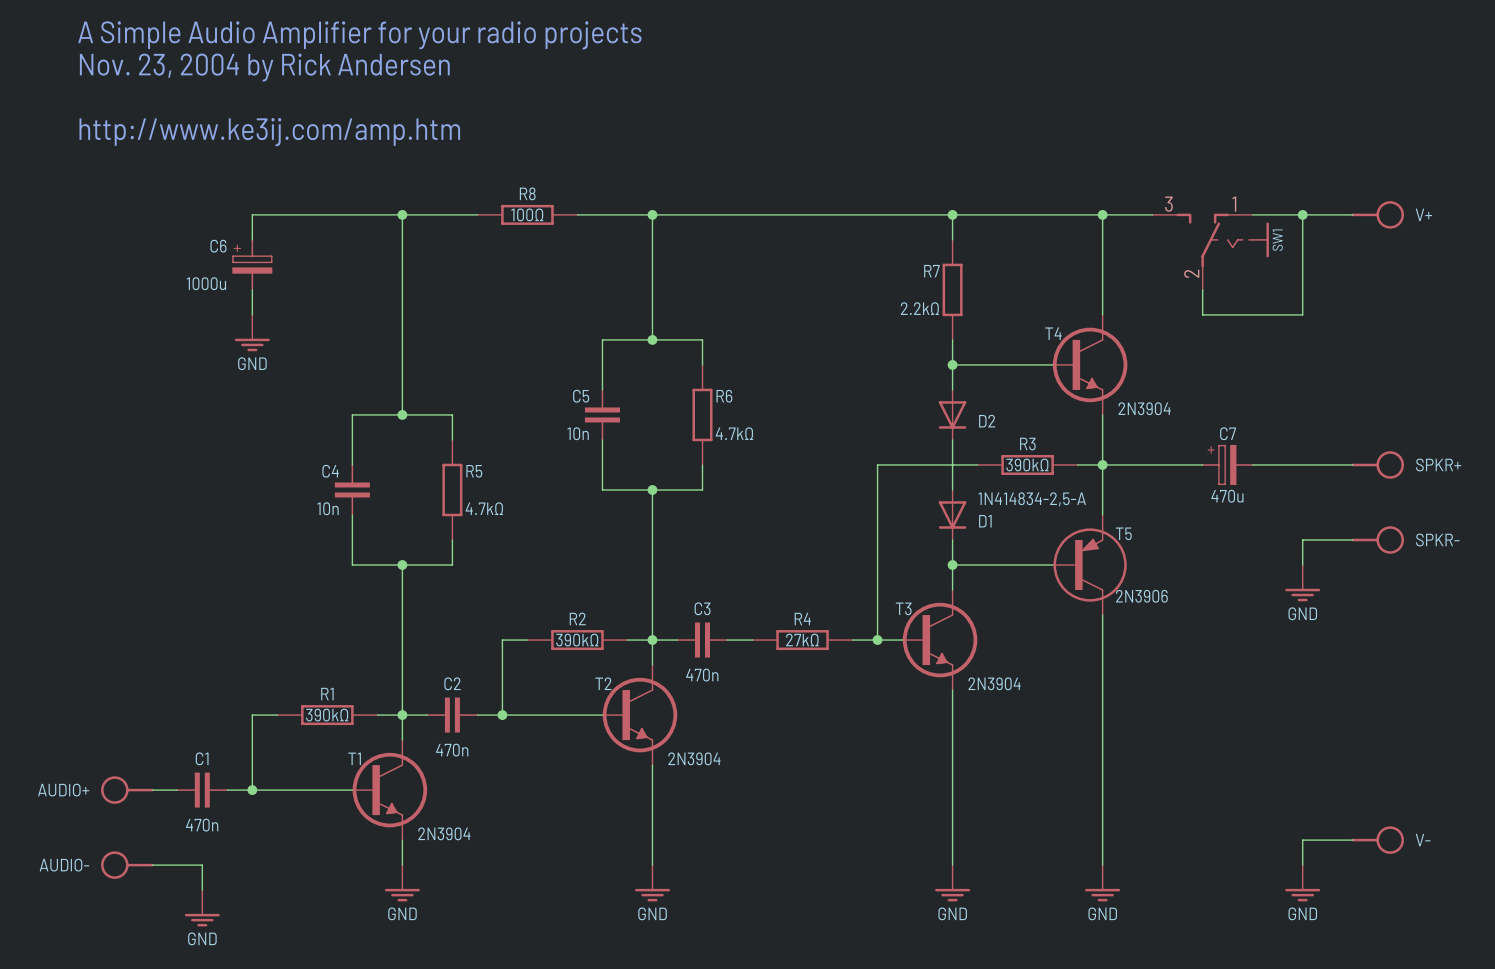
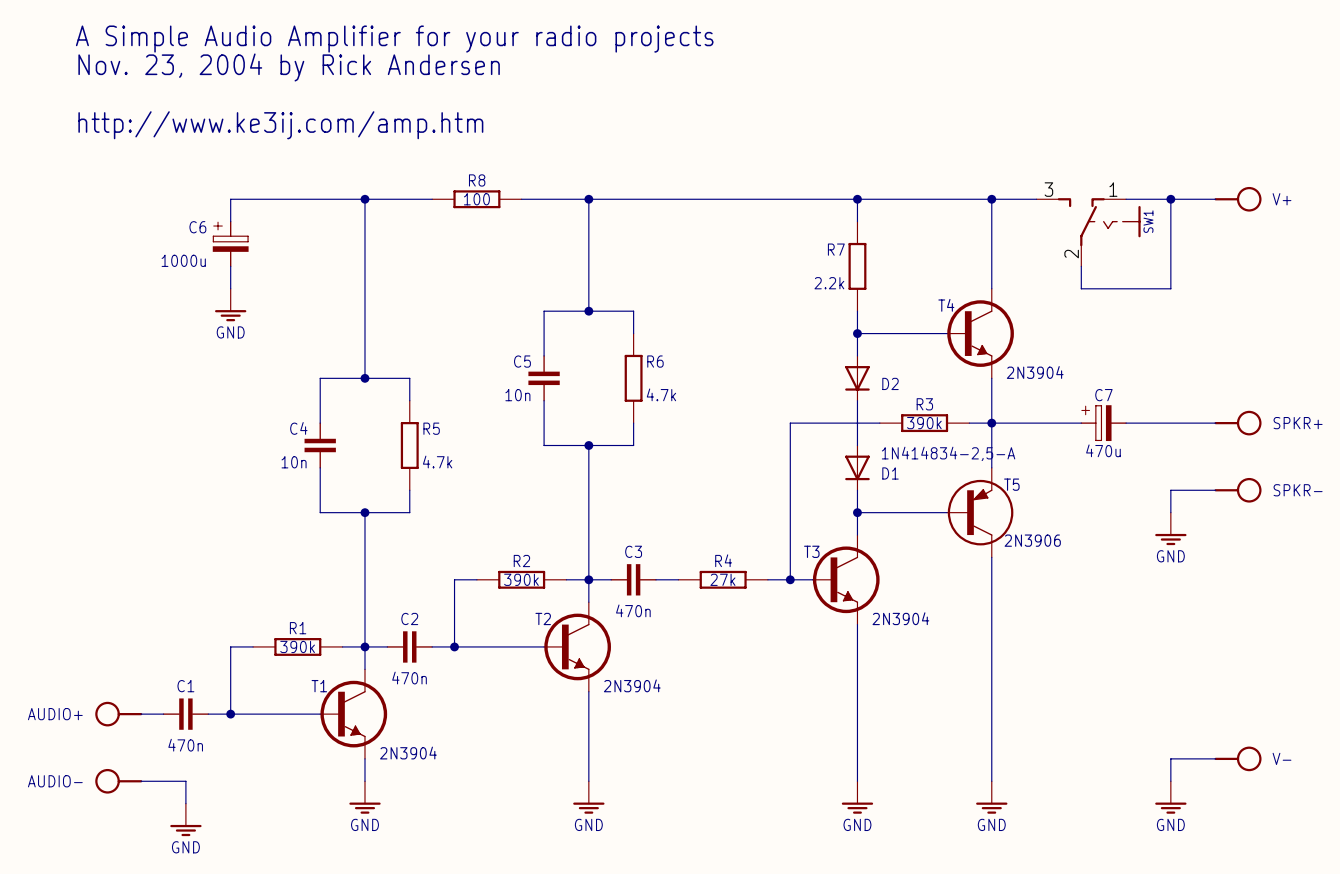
R8 value: 100Ω (527, 214) -> 100 (476, 199)
R7 value: 2.2kΩ (919, 308) -> 2.2k (829, 283)
R6 value: 4.7kΩ (734, 433) -> 4.7k (661, 394)
R3 value: 390kΩ (1027, 464) -> 390k (924, 423)
R5 value: 4.7kΩ (484, 508) -> 4.7k (437, 462)
R4 value: 27kΩ (802, 639) -> 27k (722, 579)
R2 value: 390kΩ (577, 640) -> 390k (521, 579)
R1 value: 390kΩ (327, 715) -> 390k (297, 646)

